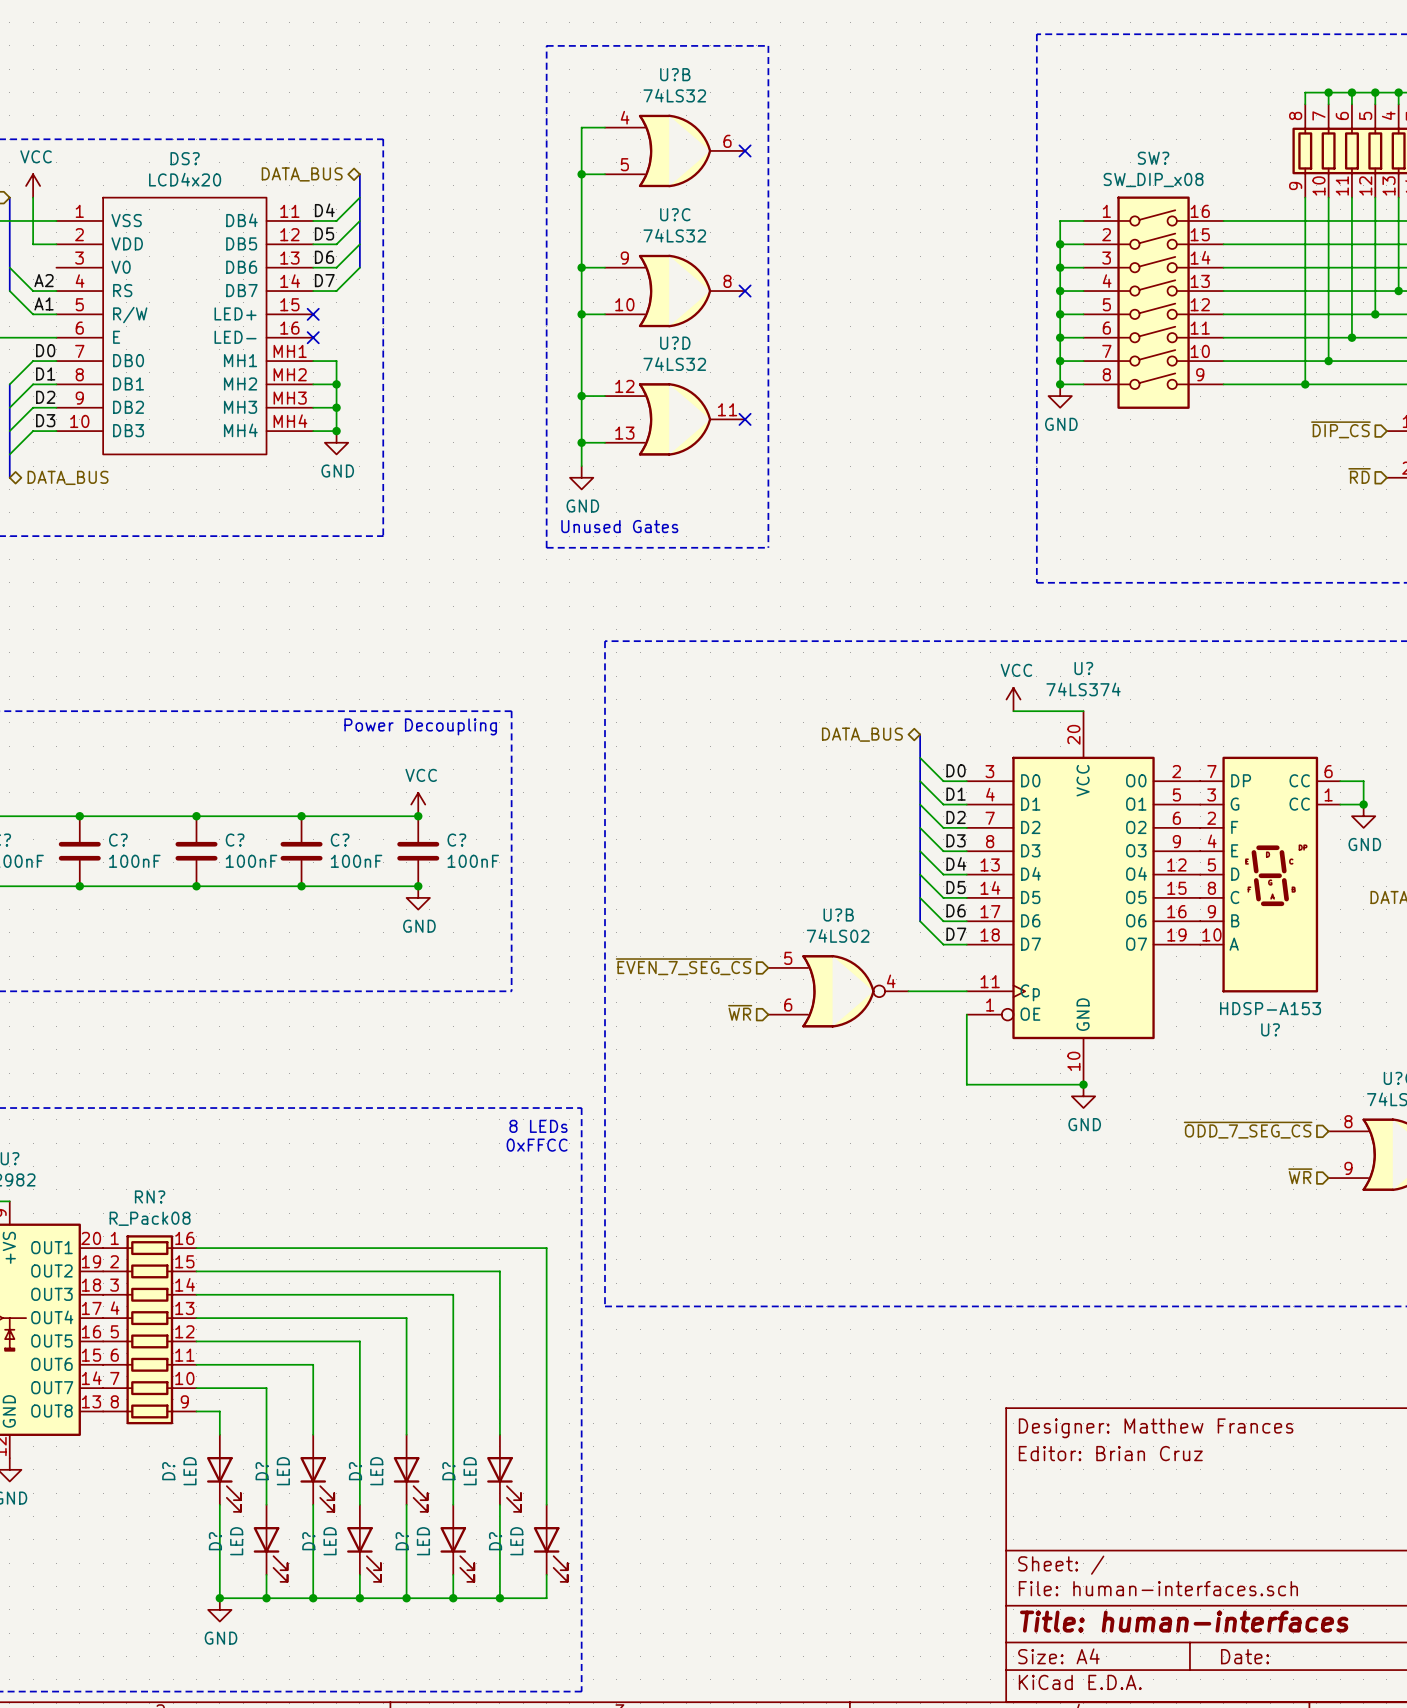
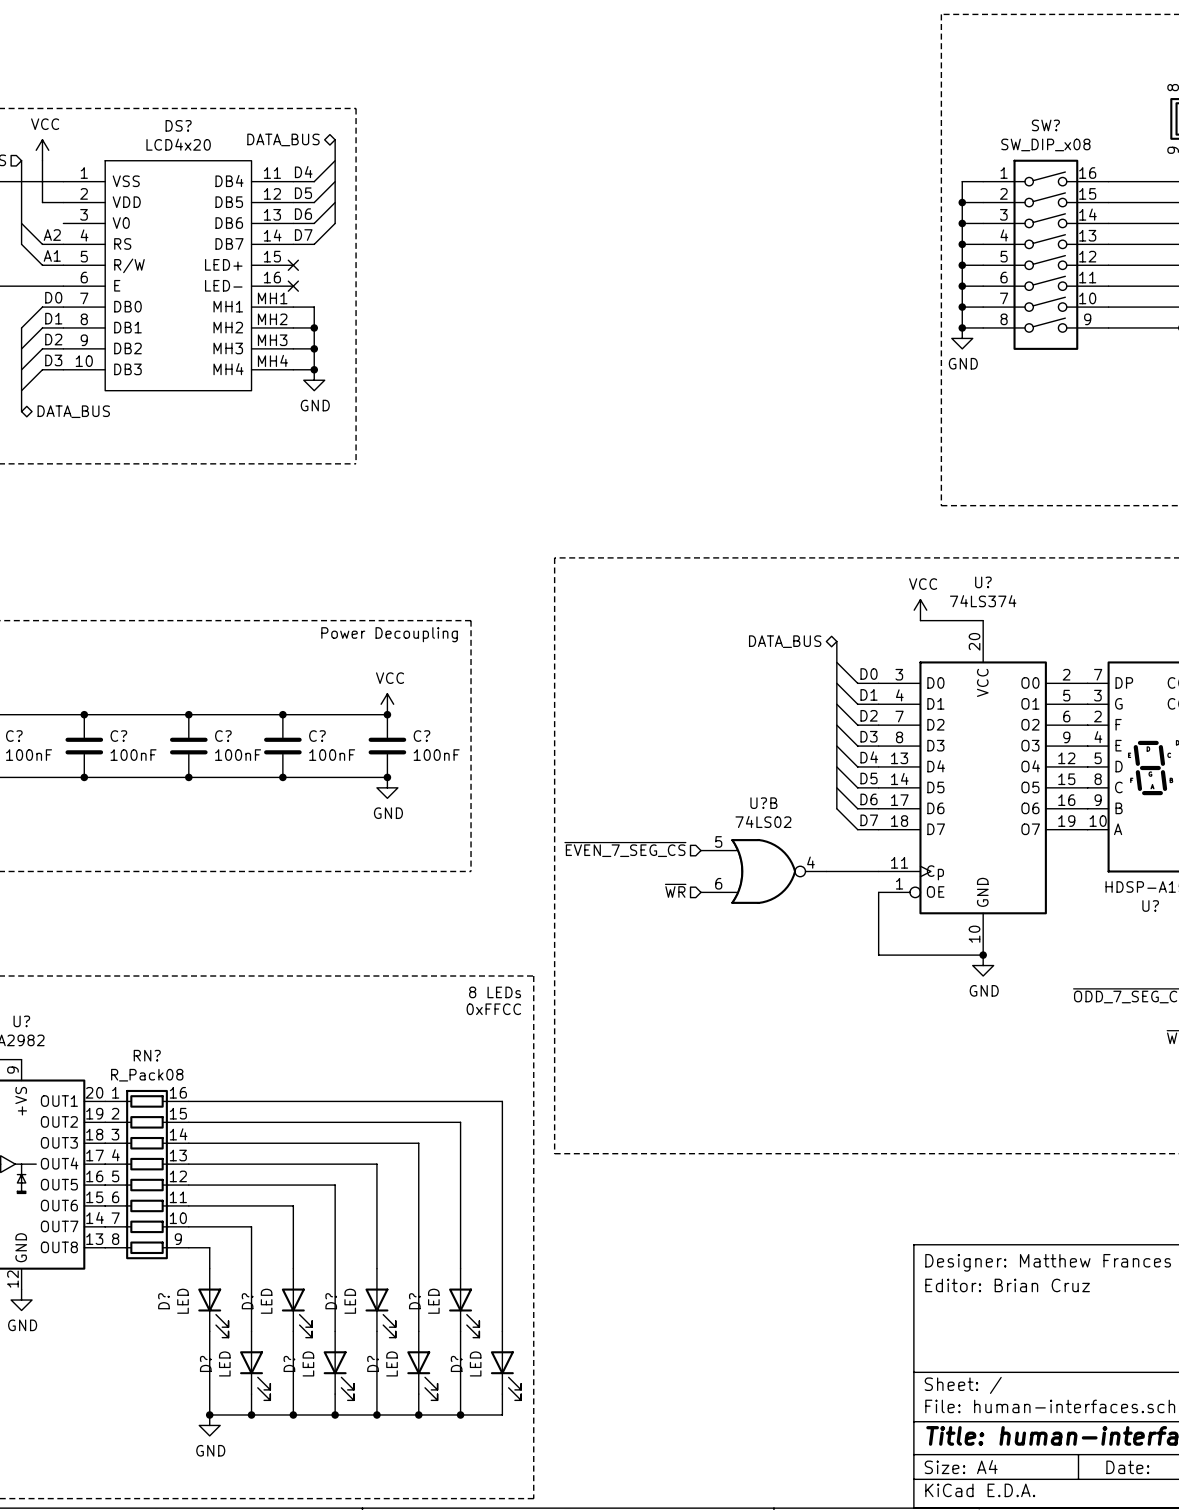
line: (546, 45) (546, 547) (768, 547) (768, 45) (546, 45) -> none
wire: (604, 127) (581, 127) (581, 466) -> none
U?B: 74LS32 (675, 150) -> none
no-connect mark: (745, 150) -> none
wire: (581, 174) (604, 174) -> none
junction: (581, 174) -> none
wire: (581, 267) (604, 267) -> none
junction: (581, 267) -> none
U?C: 74LS32 (675, 291) -> none
no-connect mark: (745, 291) -> none
wire: (581, 314) (604, 314) -> none
junction: (581, 314) -> none
wire: (581, 396) (604, 396) -> none
junction: (581, 396) -> none
U?D: 74LS32 (675, 419) -> none
no-connect mark: (745, 419) -> none
wire: (581, 442) (604, 442) -> none
junction: (581, 442) -> none
power symbol: GND (581, 477) -> none
text: Unused Gates (619, 526) -> none

